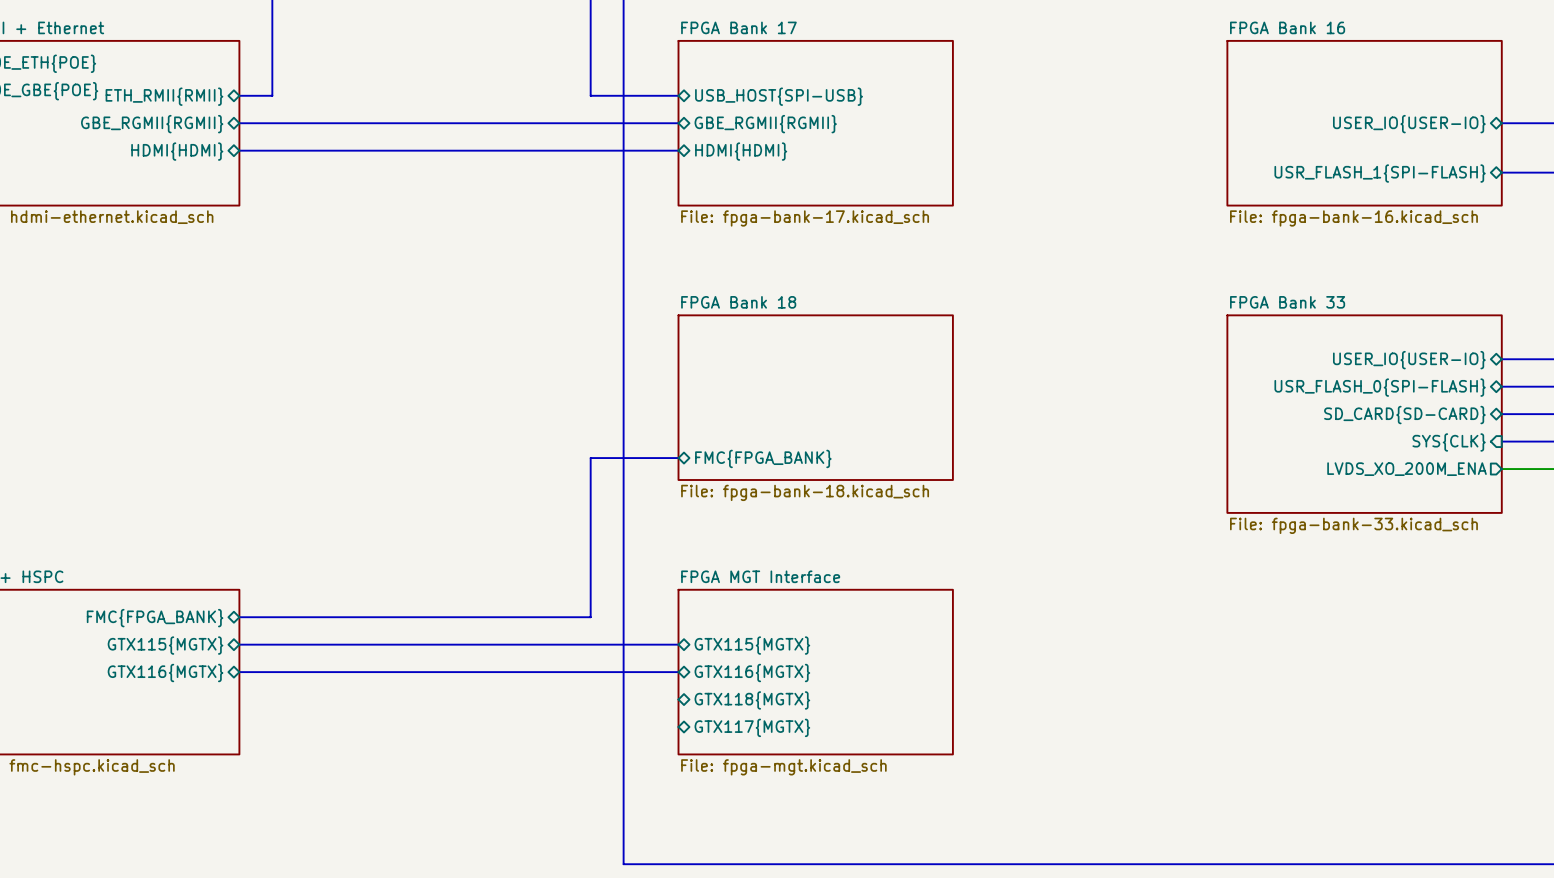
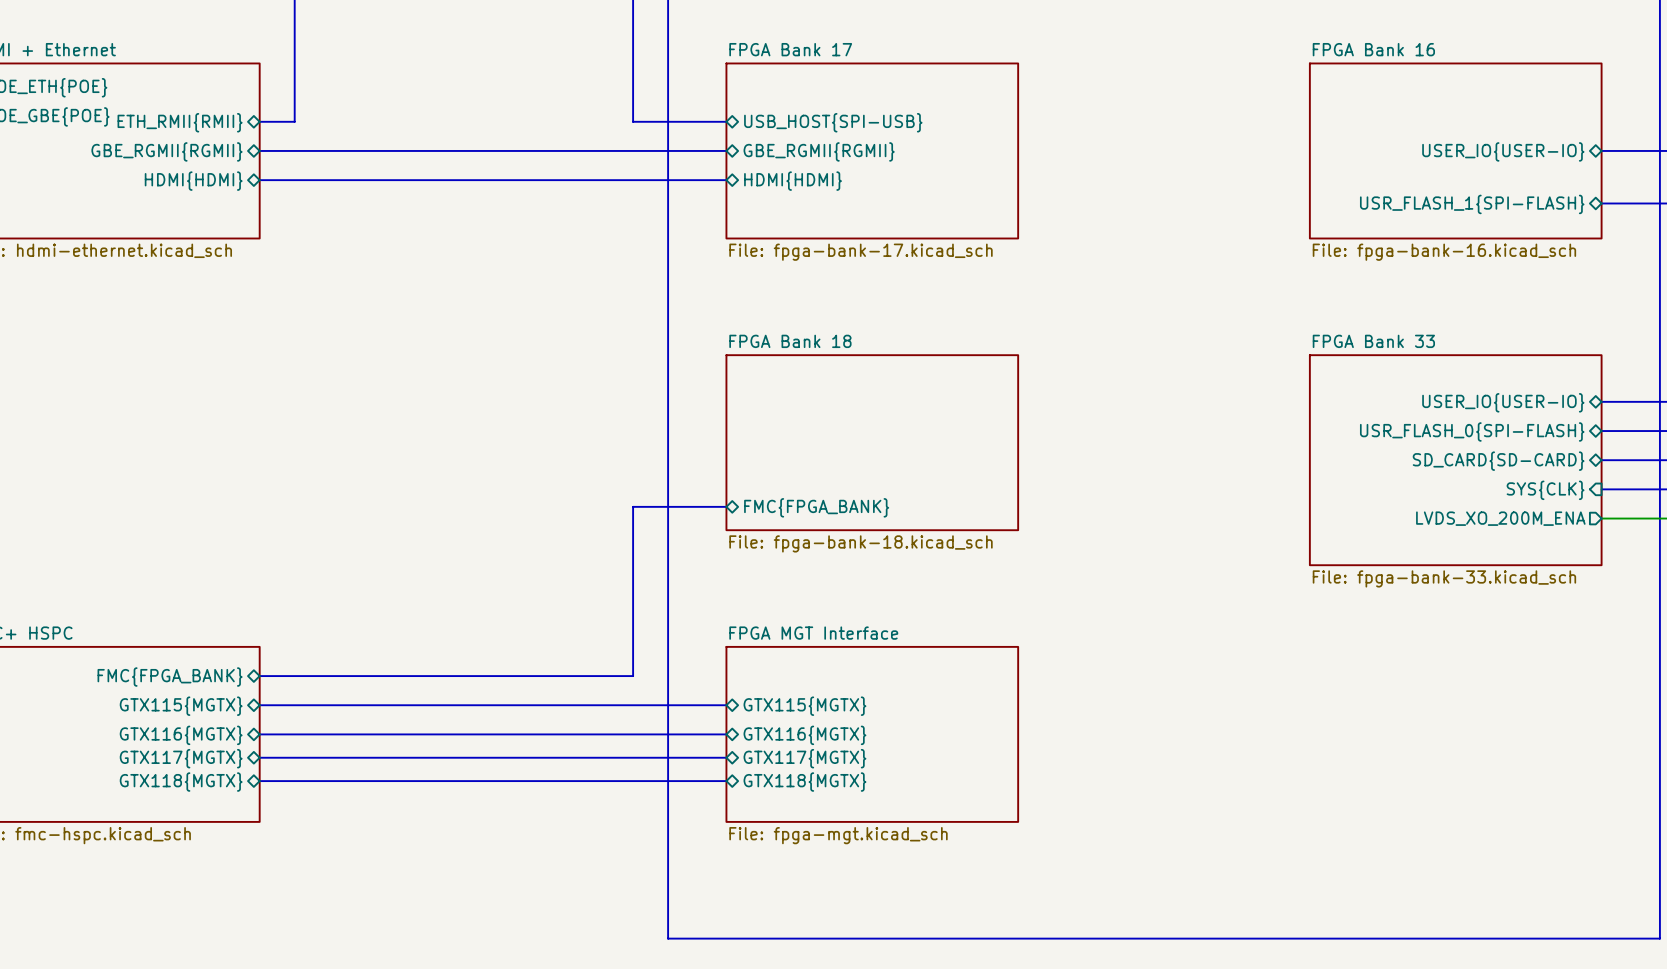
sheet pin: none -> GTX117{MGTX} (181, 758)
bus: none -> (259, 757) (726, 757)
sheet pin position: GTX118{MGTX} (752, 700) -> GTX118{MGTX} (804, 782)
sheet pin: none -> GTX118{MGTX} (181, 782)
bus: none -> (259, 781) (726, 781)
sheet pin position: GTX117{MGTX} (752, 727) -> GTX117{MGTX} (804, 758)

